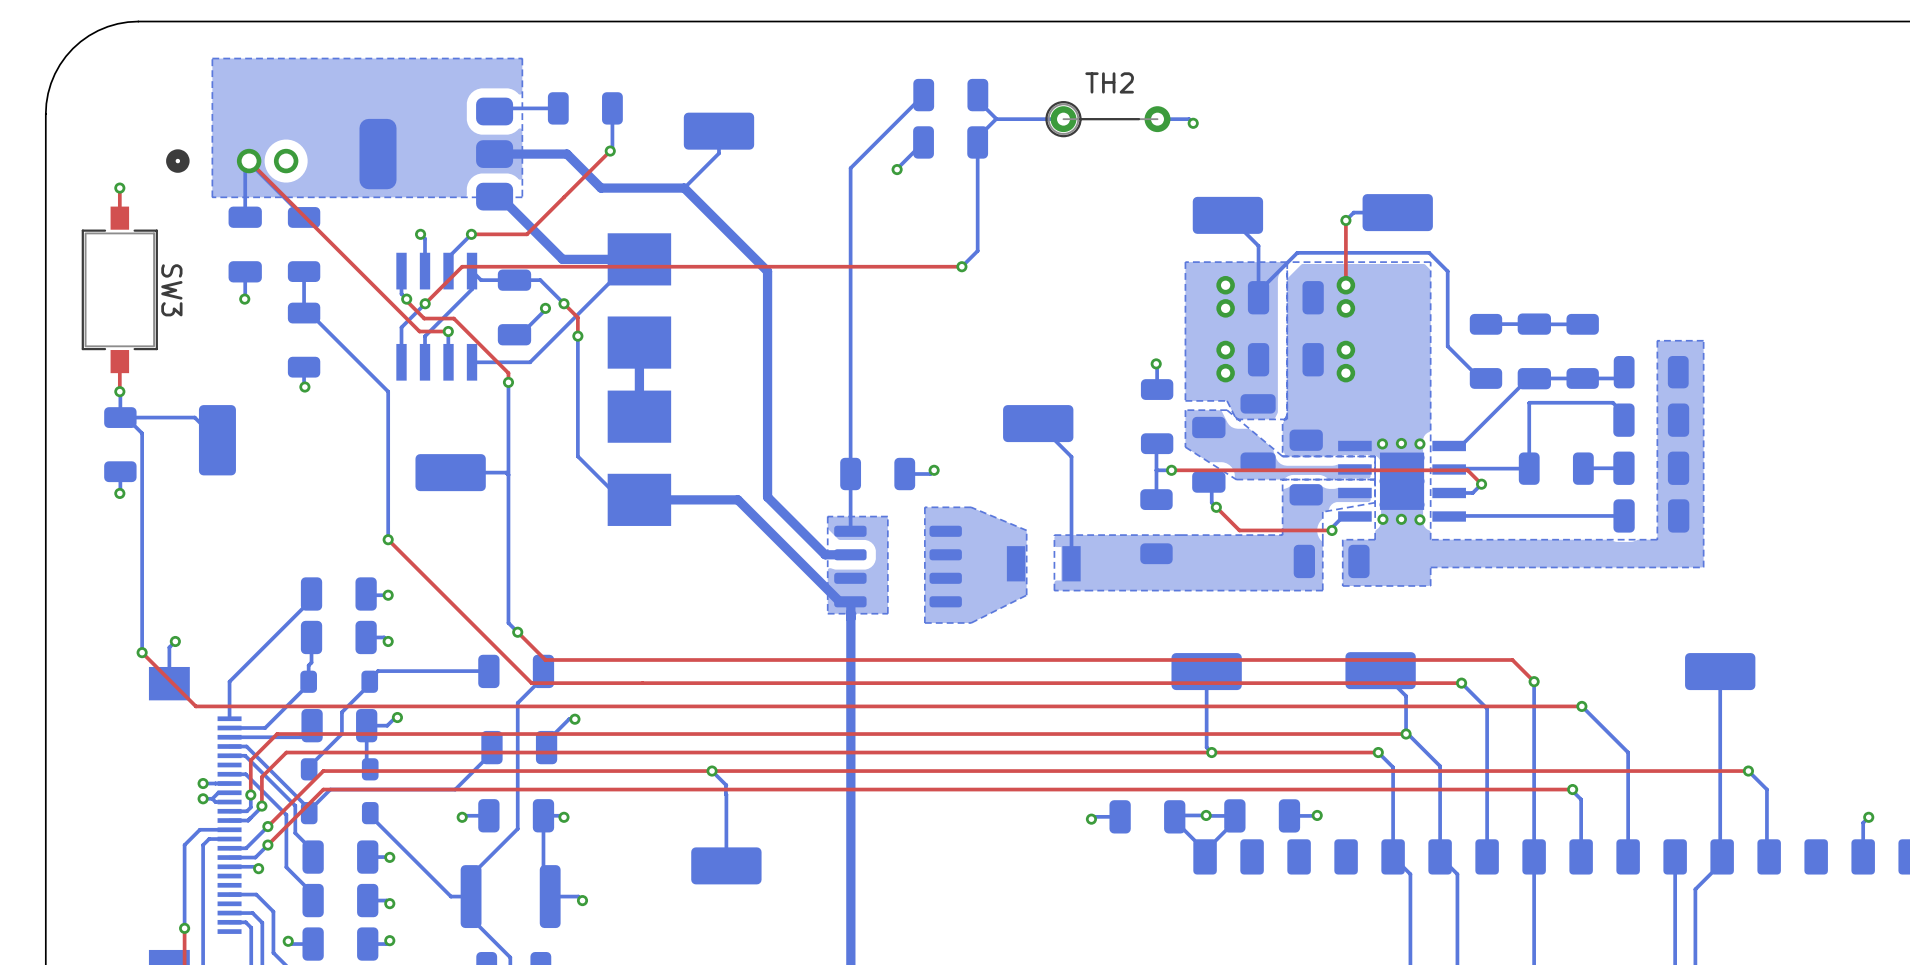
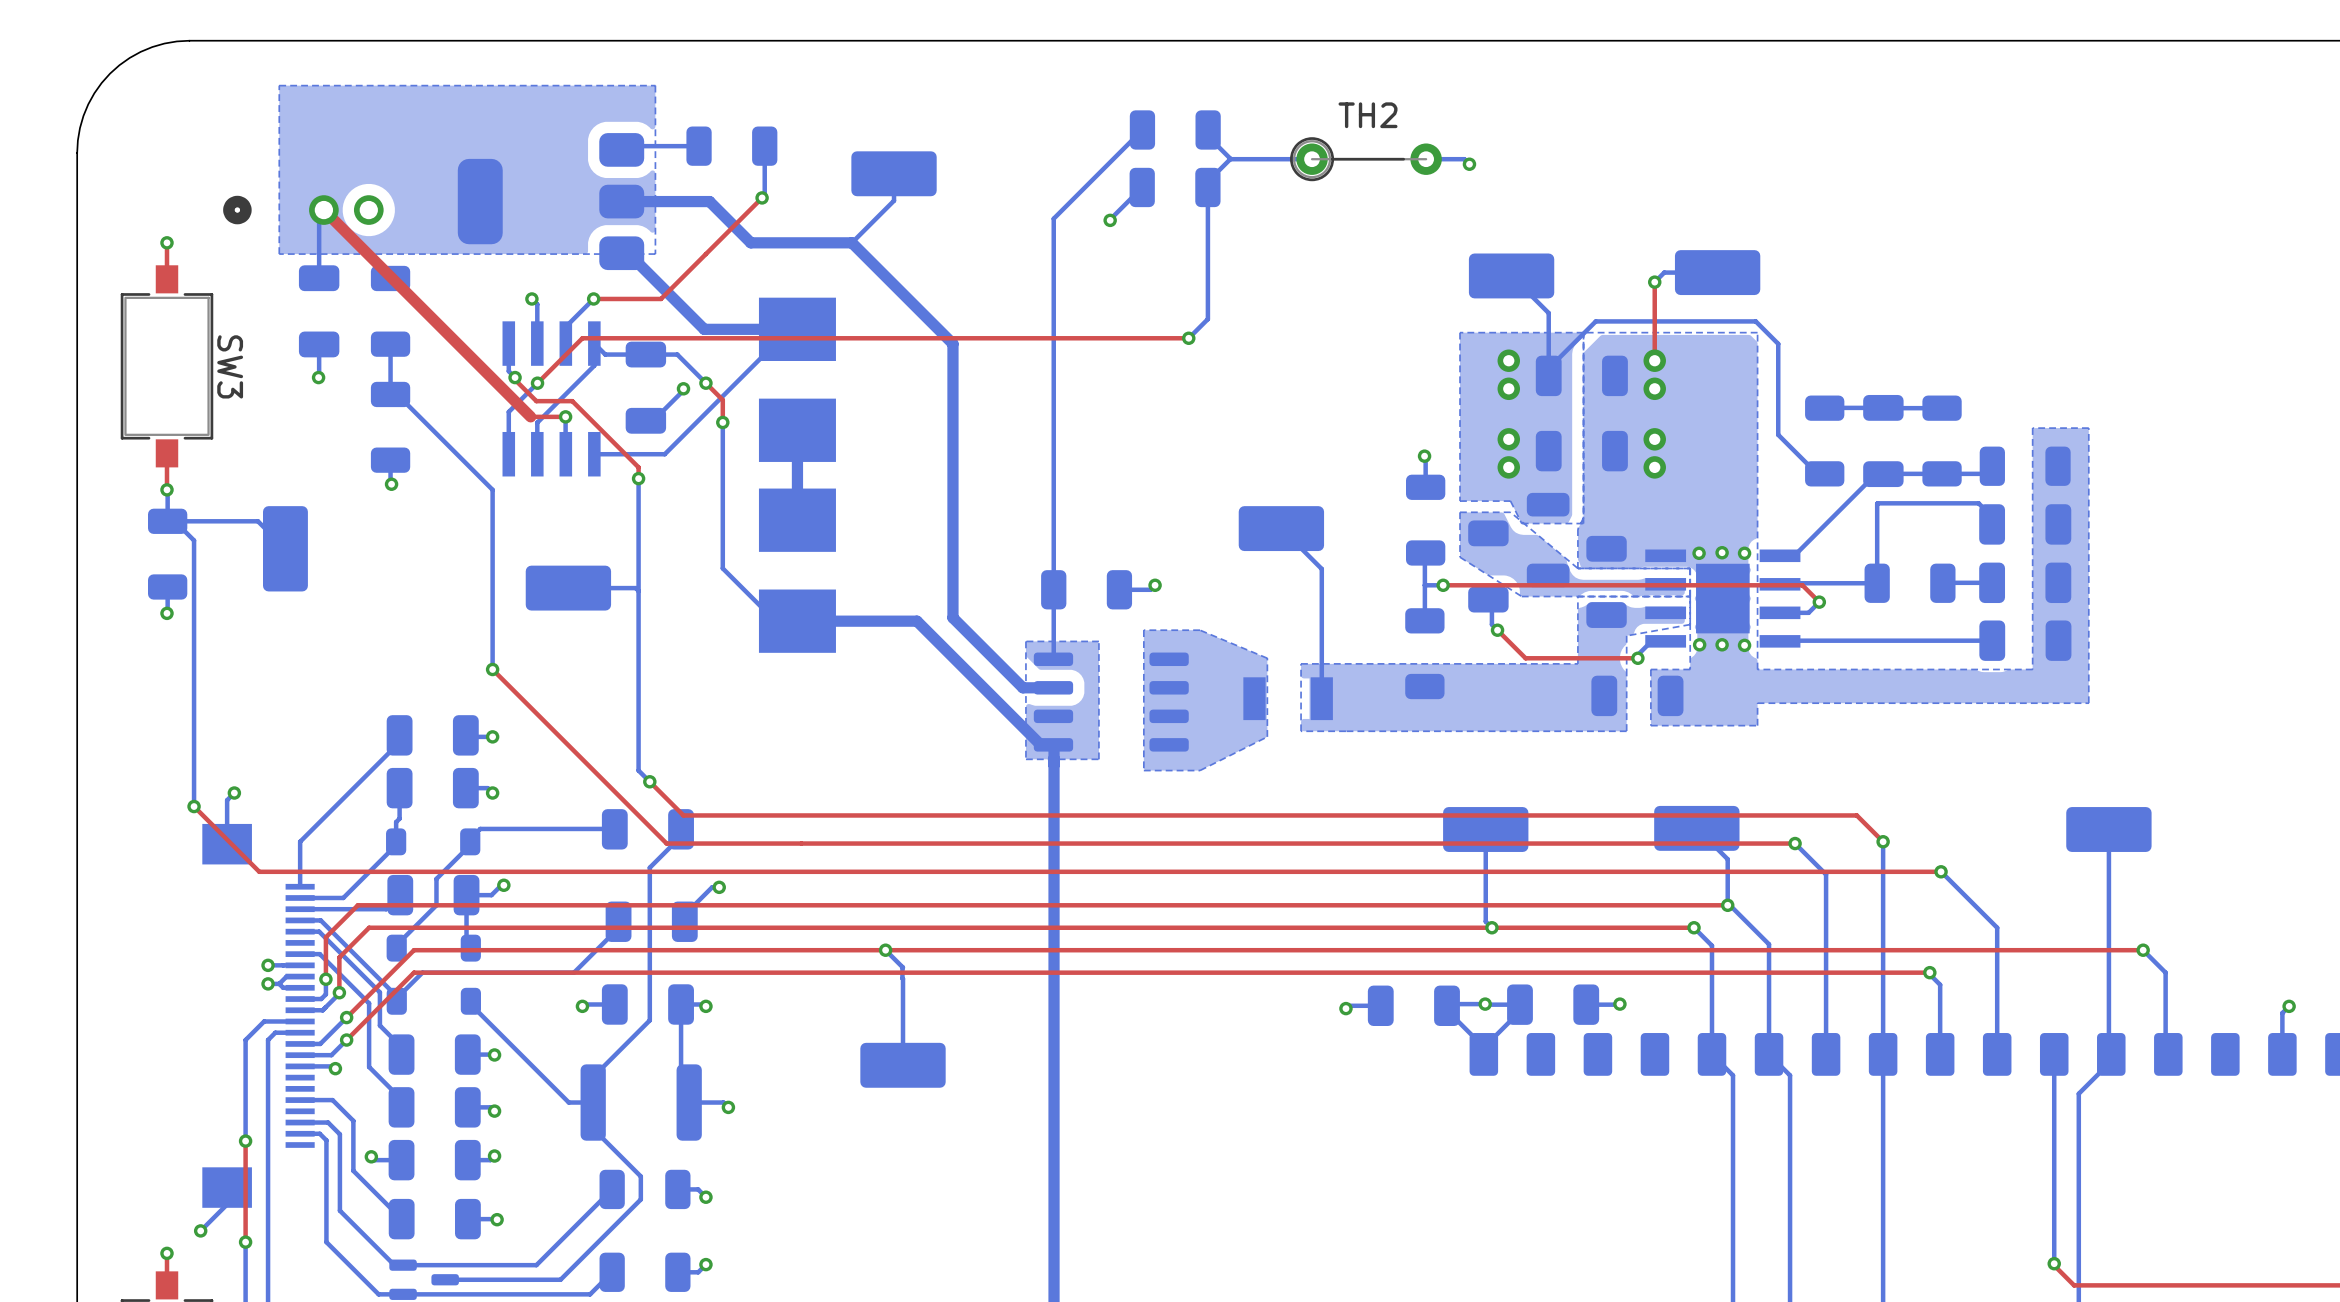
top track width: thin (249, 161) (419, 331) -> thick (323, 210) (530, 416)

